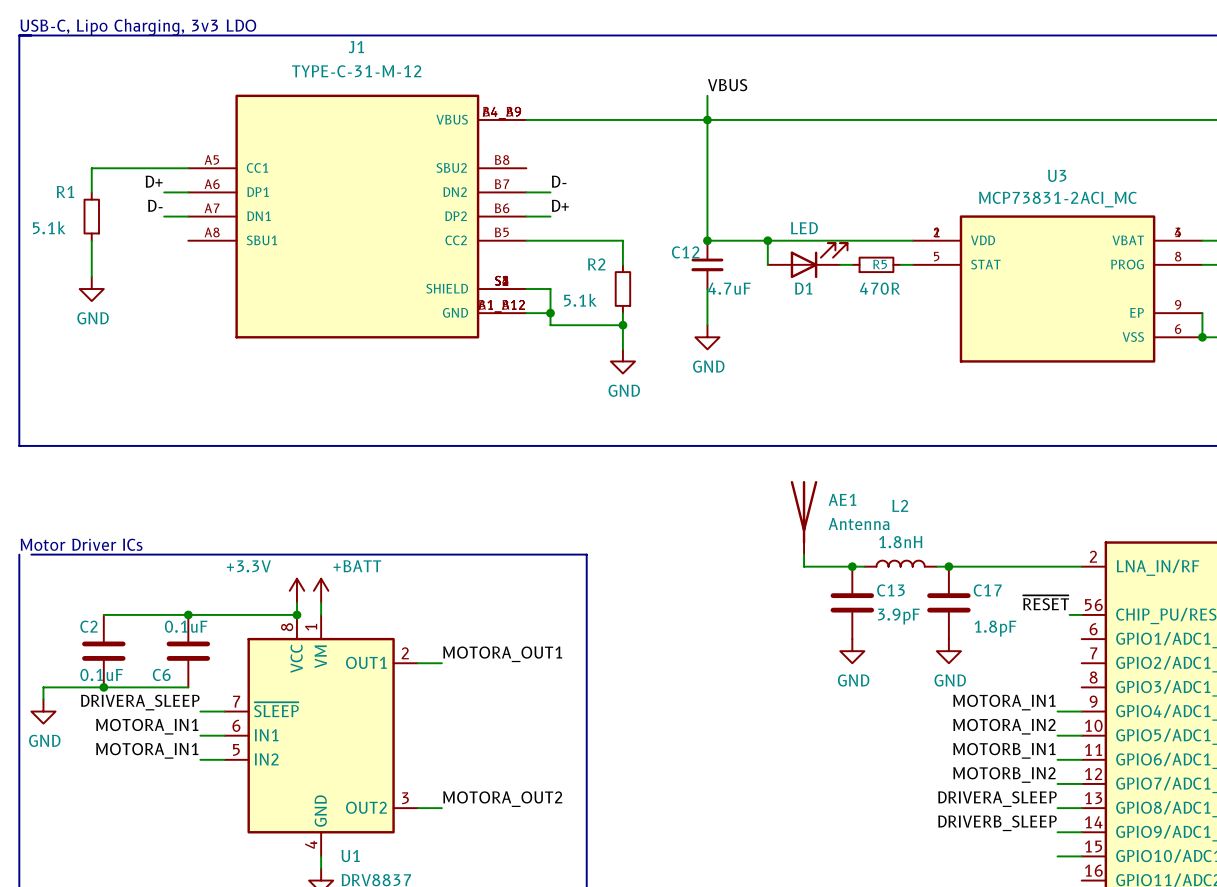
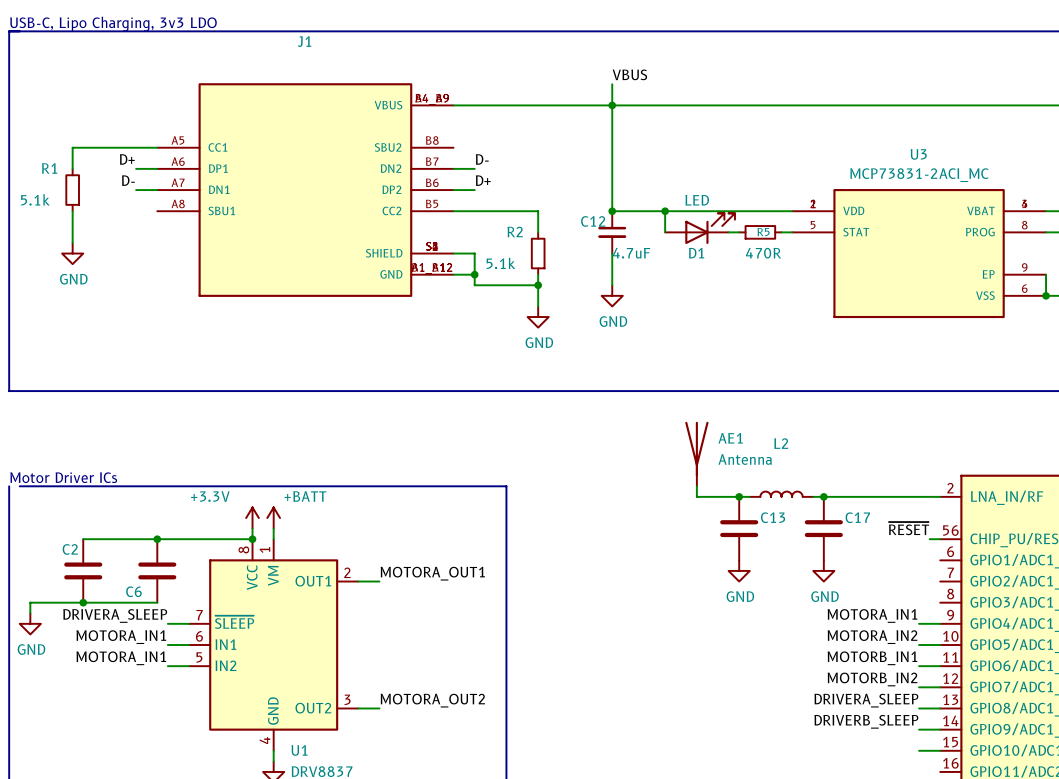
J1 value: TYPE-C-31-M-12 (356, 71) -> none
L2 value: 1.8nH (900, 542) -> none
C13 value: 3.9pF (898, 616) -> none
C6 value: 0.1uF (186, 626) -> none
C17 value: 1.8pF (995, 628) -> none
C2 value: 0.1uF (101, 674) -> none

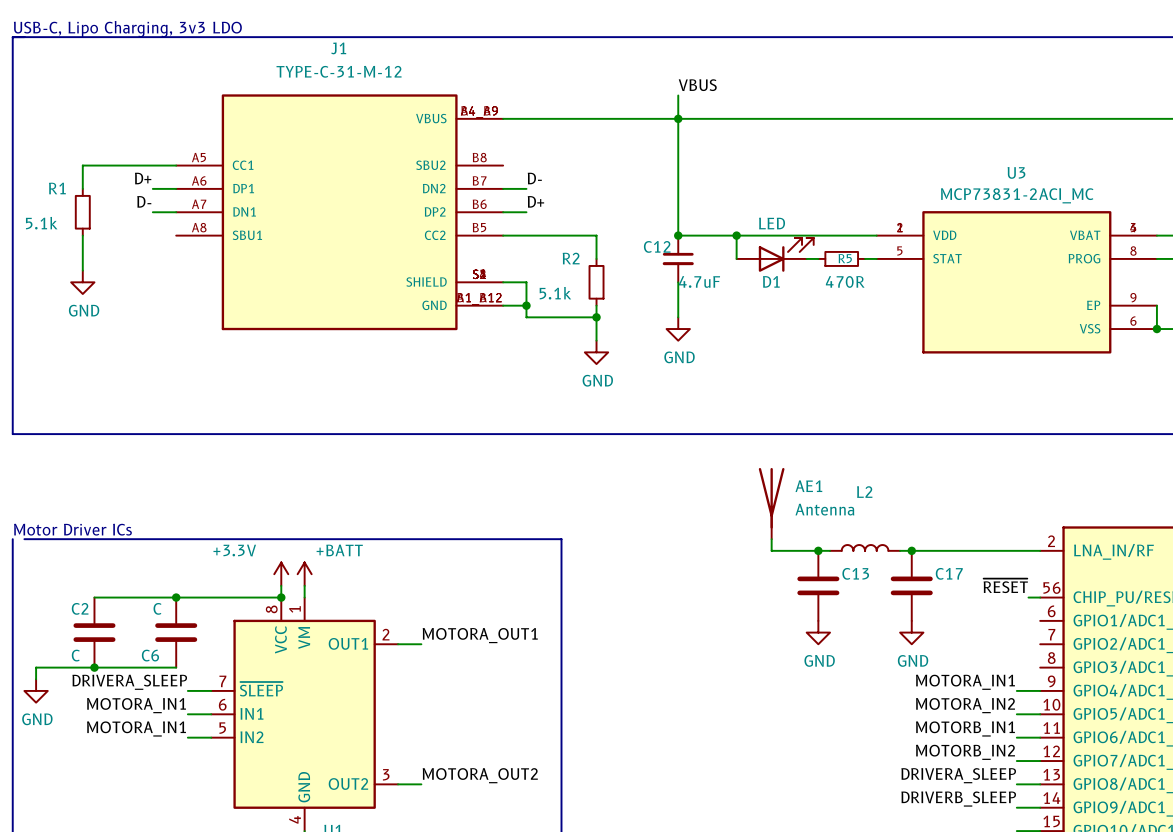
J1 value: none -> TYPE-C-31-M-12 (339, 71)
C6 value: none -> C (157, 608)
C2 value: none -> C (75, 655)

